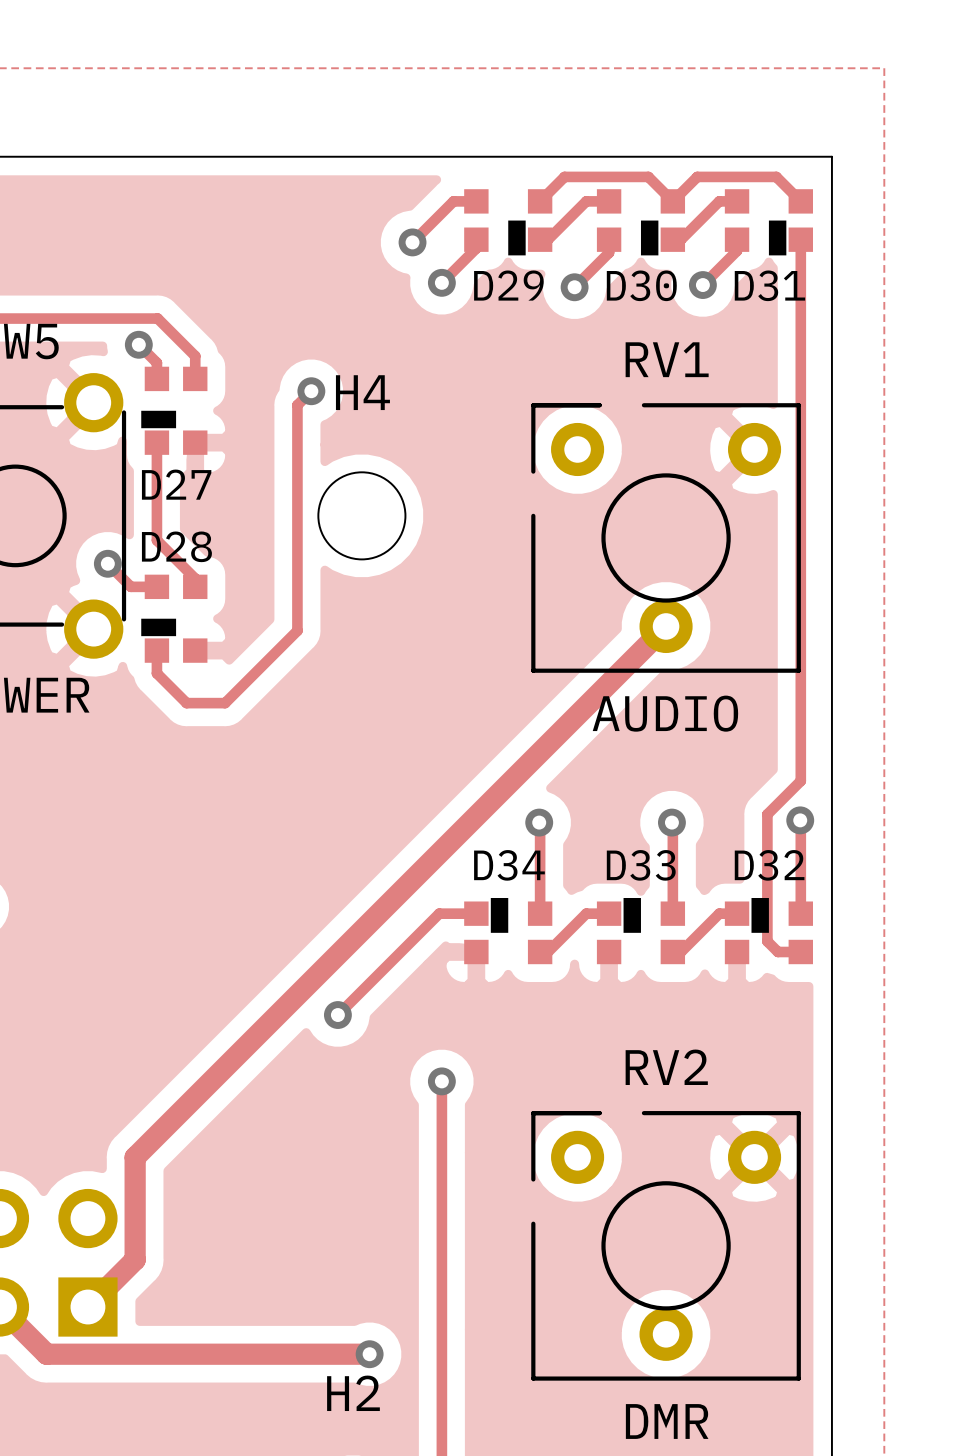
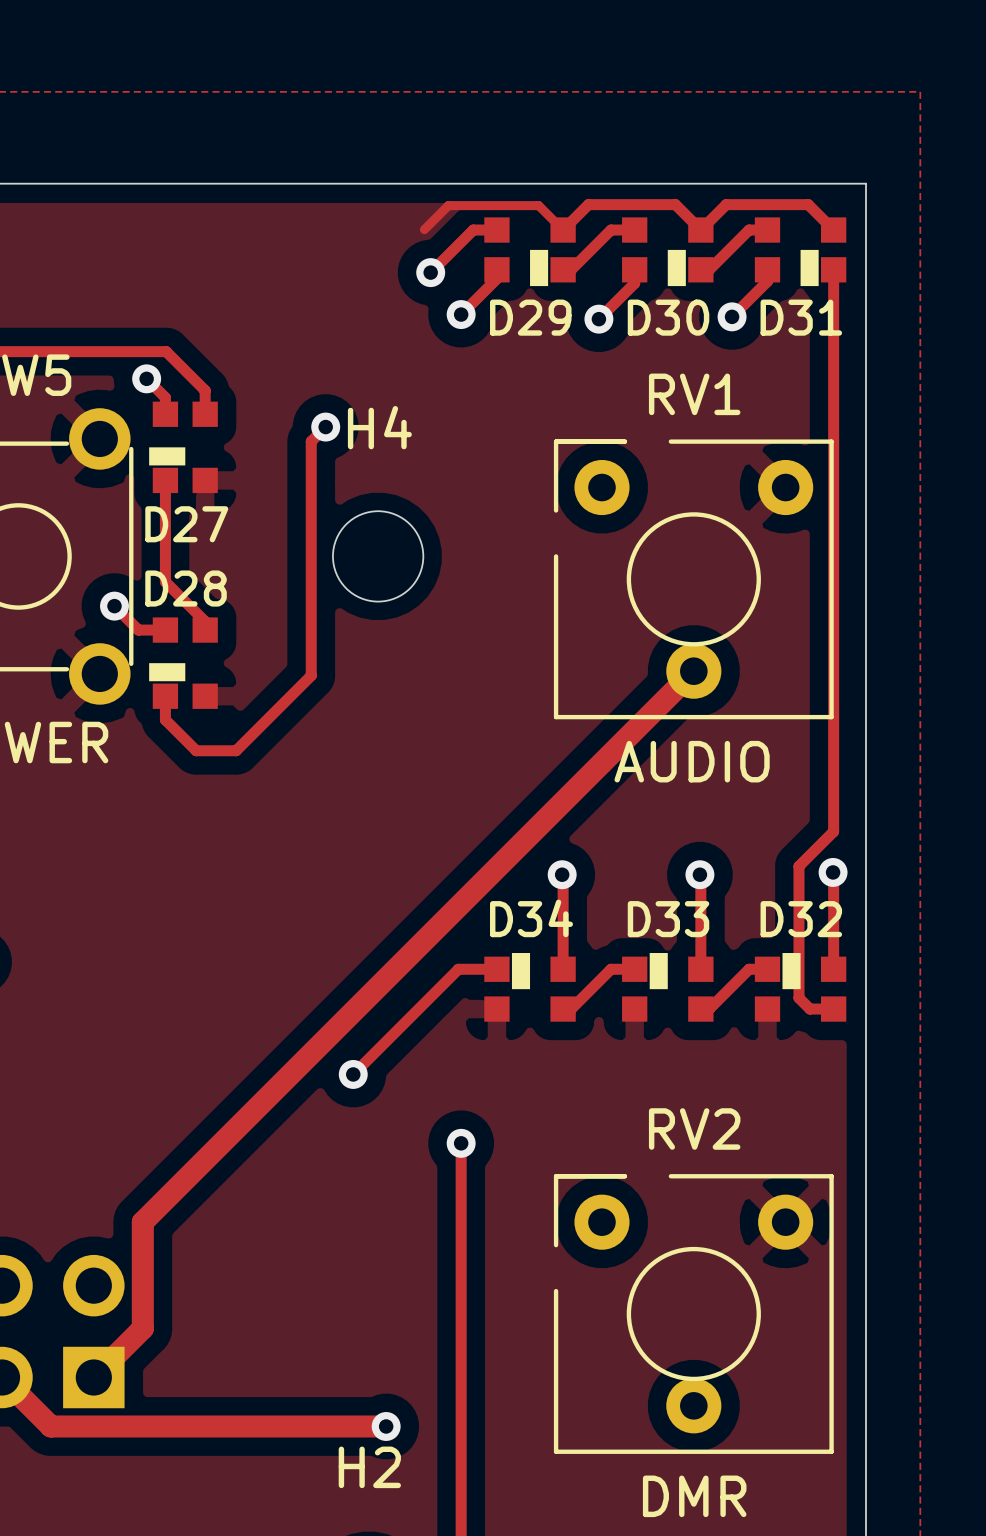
track: none -> (424, 229) (448, 205) (538, 205) (563, 230)

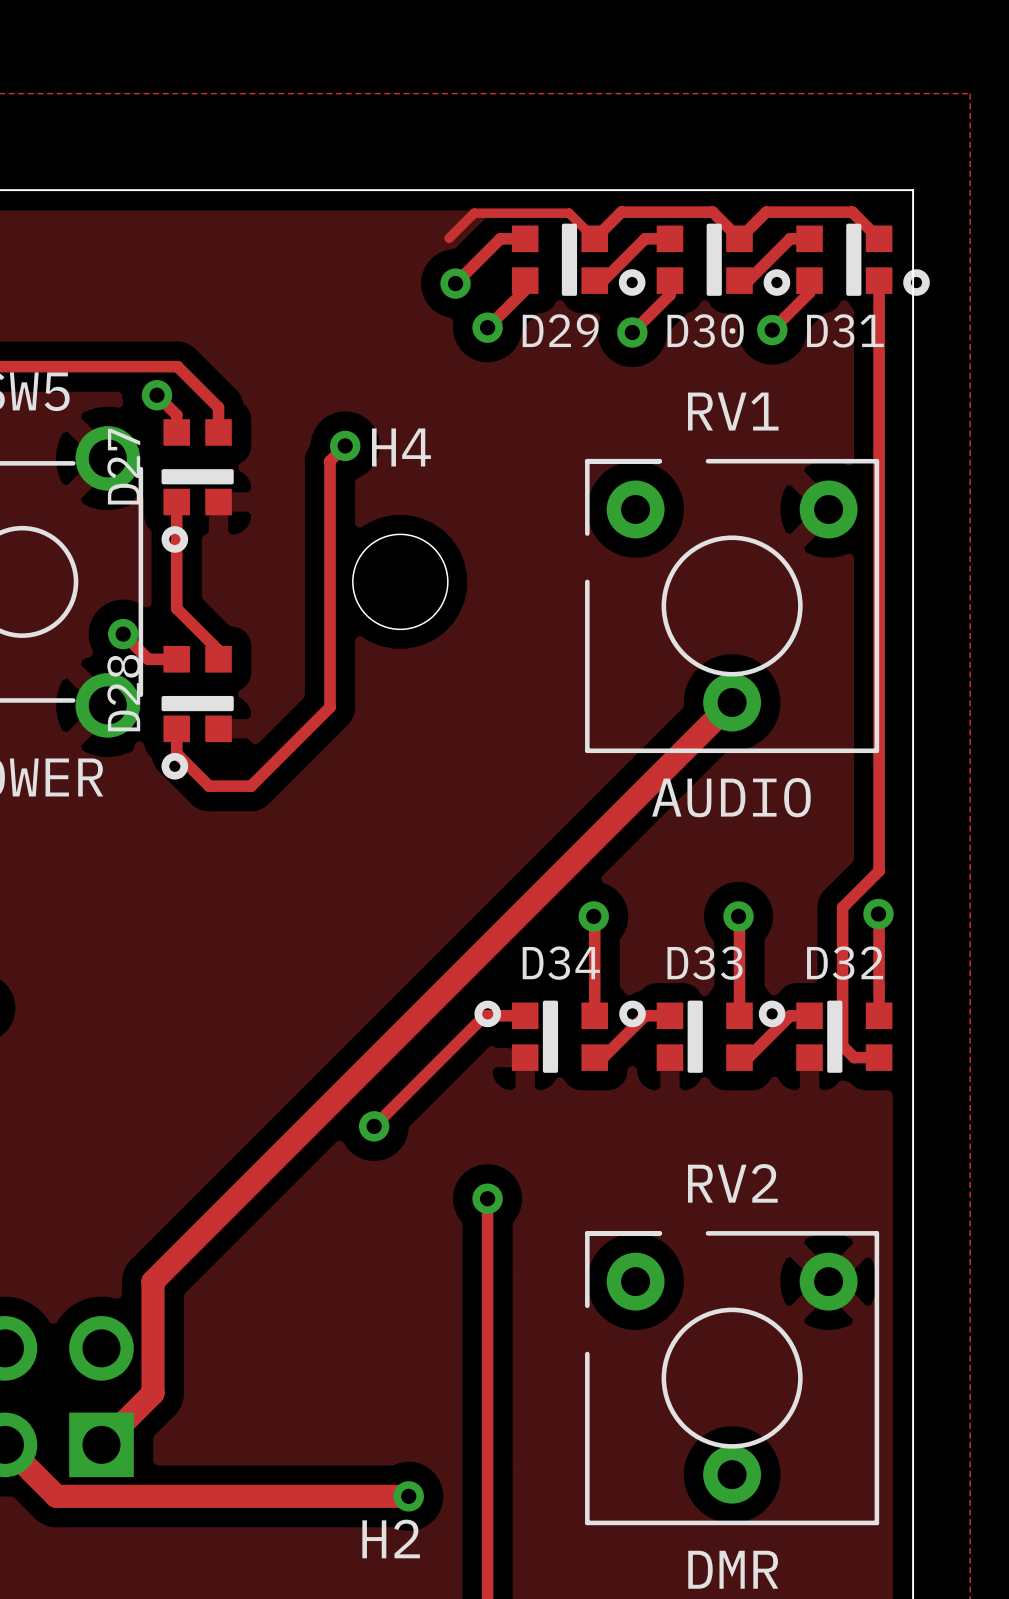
D29 footprint: [484, 217, 576, 287] -> [511, 223, 646, 296]
D30 footprint: [622, 217, 714, 287] -> [656, 223, 791, 296]
D31 footprint: [754, 217, 847, 287] -> [796, 223, 930, 296]
D27 footprint: [149, 401, 218, 494] -> [161, 419, 234, 553]
D27 name position: D27 (186, 524) -> D27 (123, 466)
D28 name position: D28 (186, 588) -> D28 (124, 693)
D28 footprint: [149, 617, 218, 709] -> [161, 646, 234, 780]
D34 footprint: [484, 953, 576, 1022] -> [474, 1000, 609, 1073]
D33 footprint: [622, 953, 714, 1022] -> [619, 1000, 753, 1073]
D32 footprint: [754, 953, 847, 1022] -> [758, 1000, 893, 1073]

